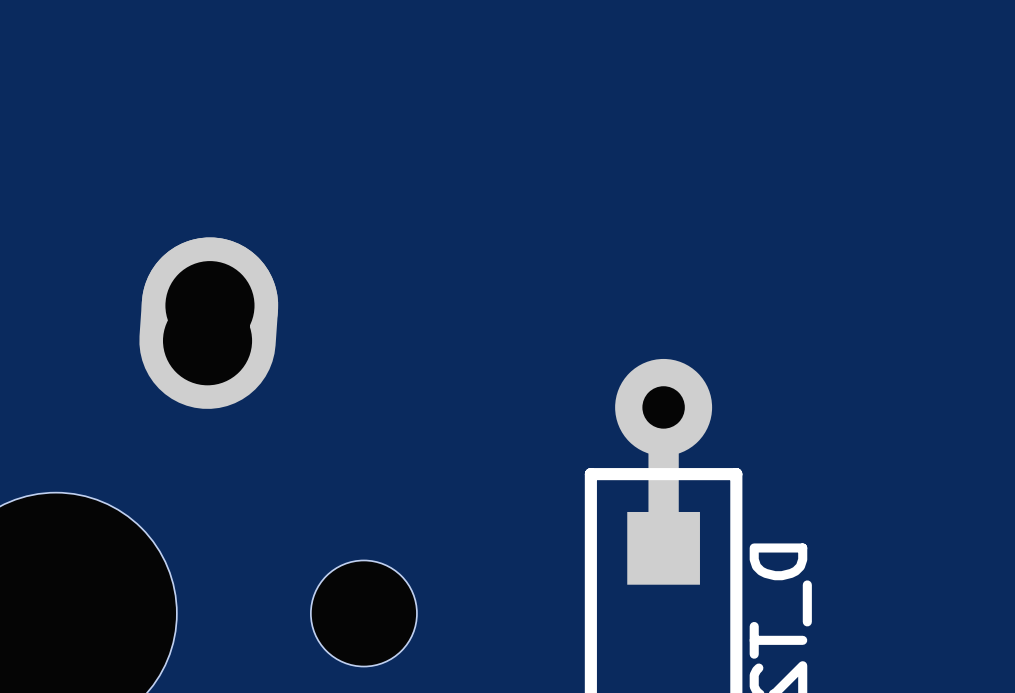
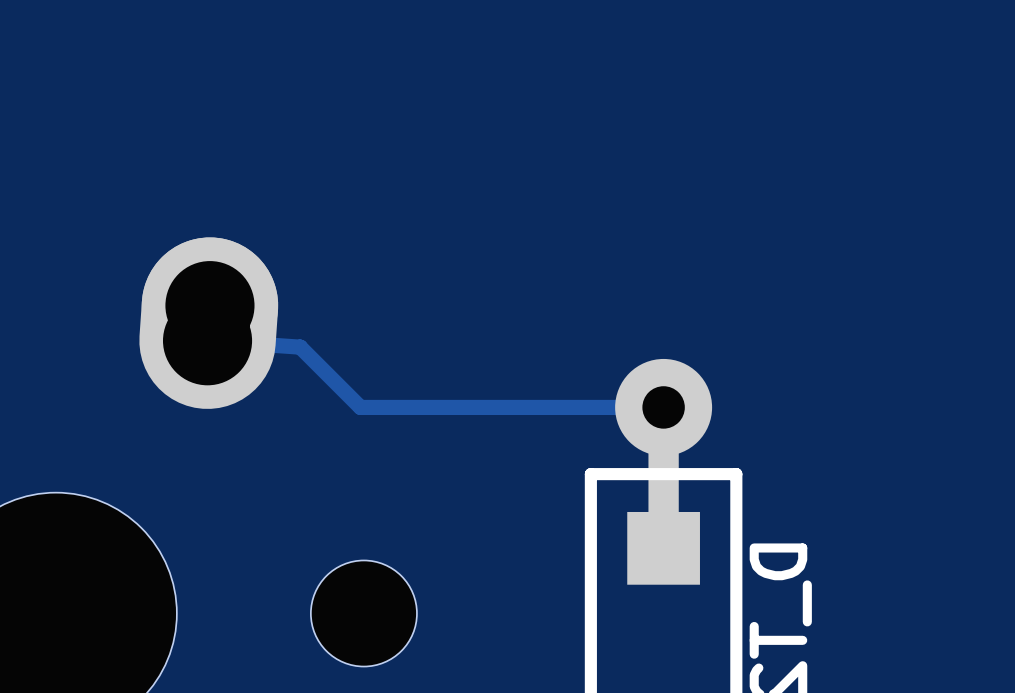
track: none -> (207, 340) (300, 347) (360, 407) (663, 407) (663, 548)

